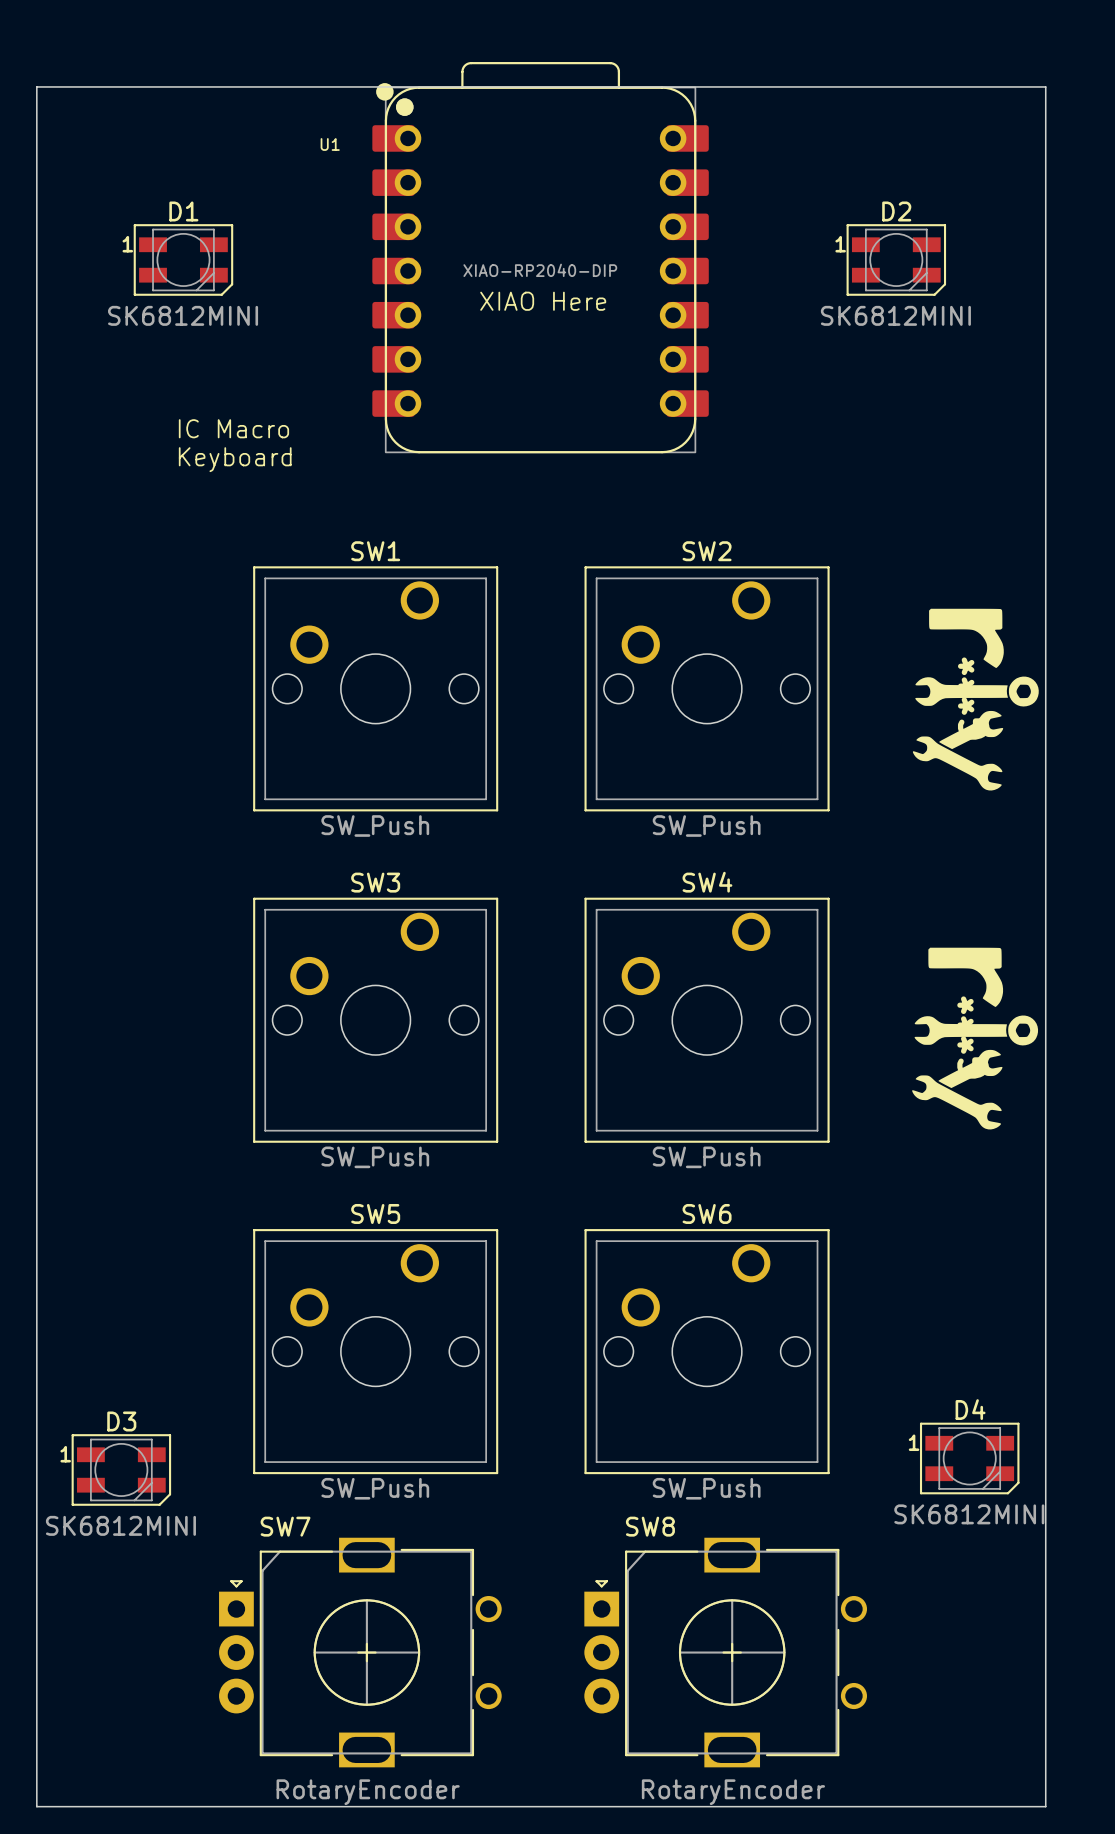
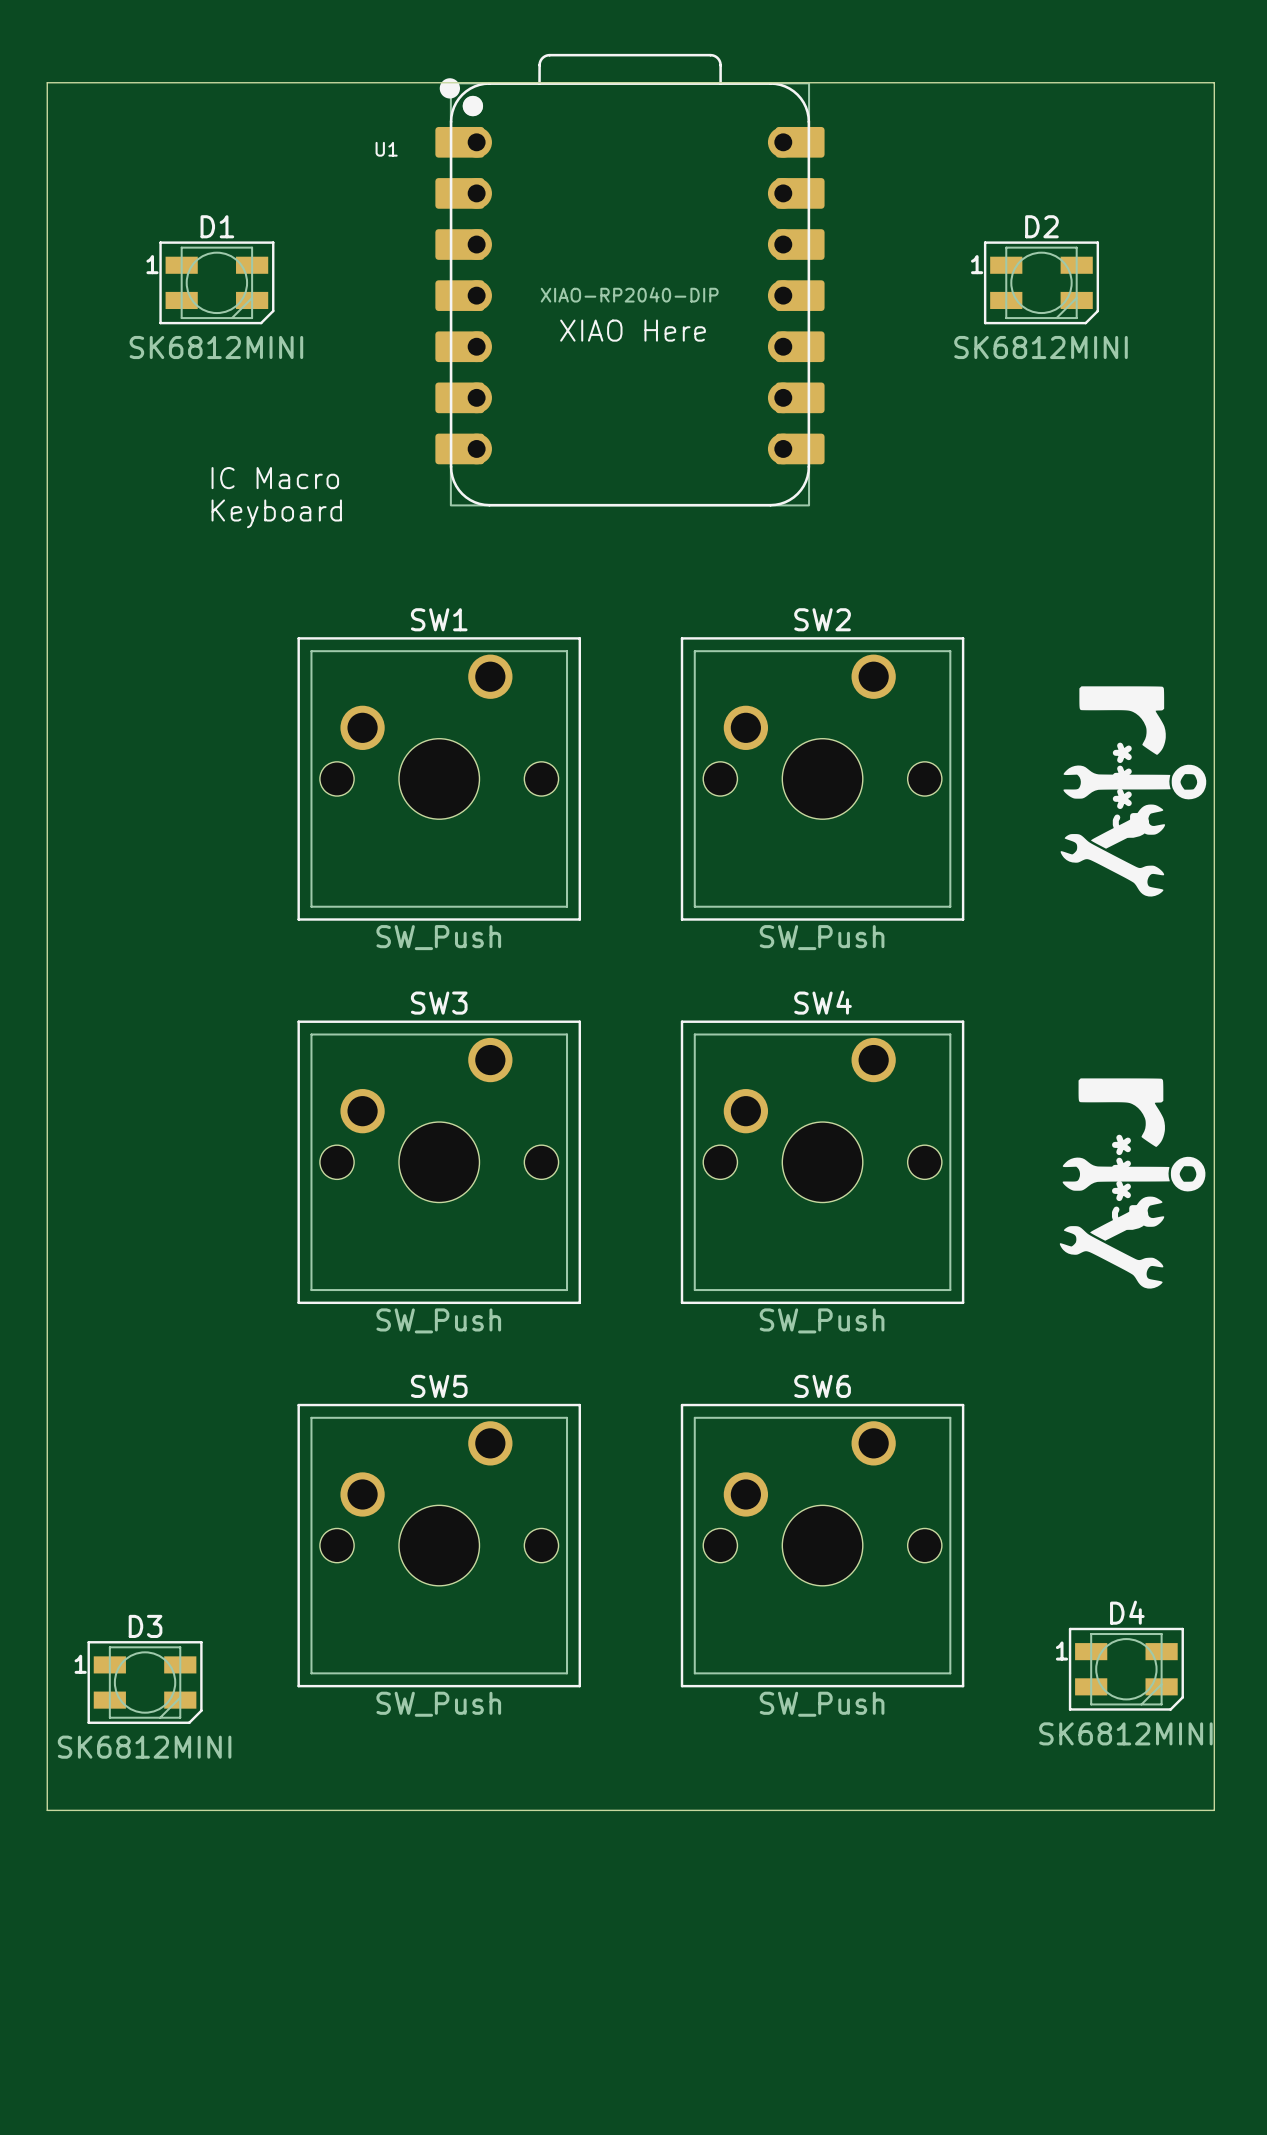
board edge: (36, 1580) (36, 1806) (1045, 1806) (1045, 1580) -> (47, 1810) (1214, 1810)
SW7: RotaryEncoder (360, 1652) -> none
SW8: RotaryEncoder (725, 1652) -> none

